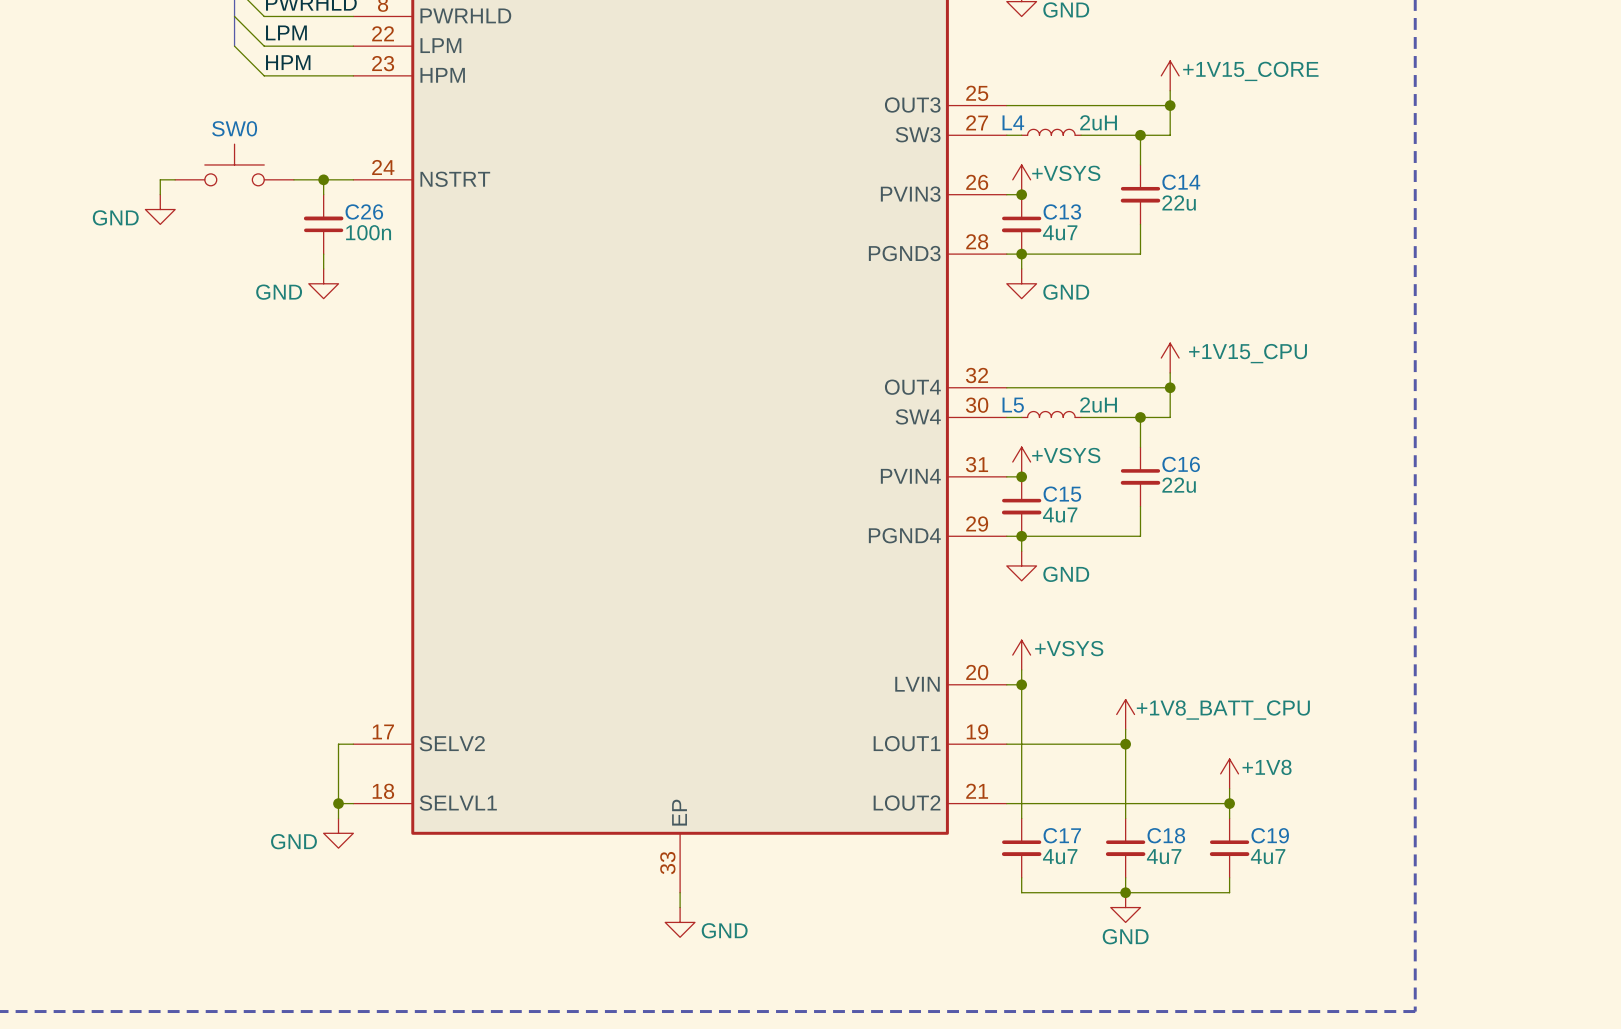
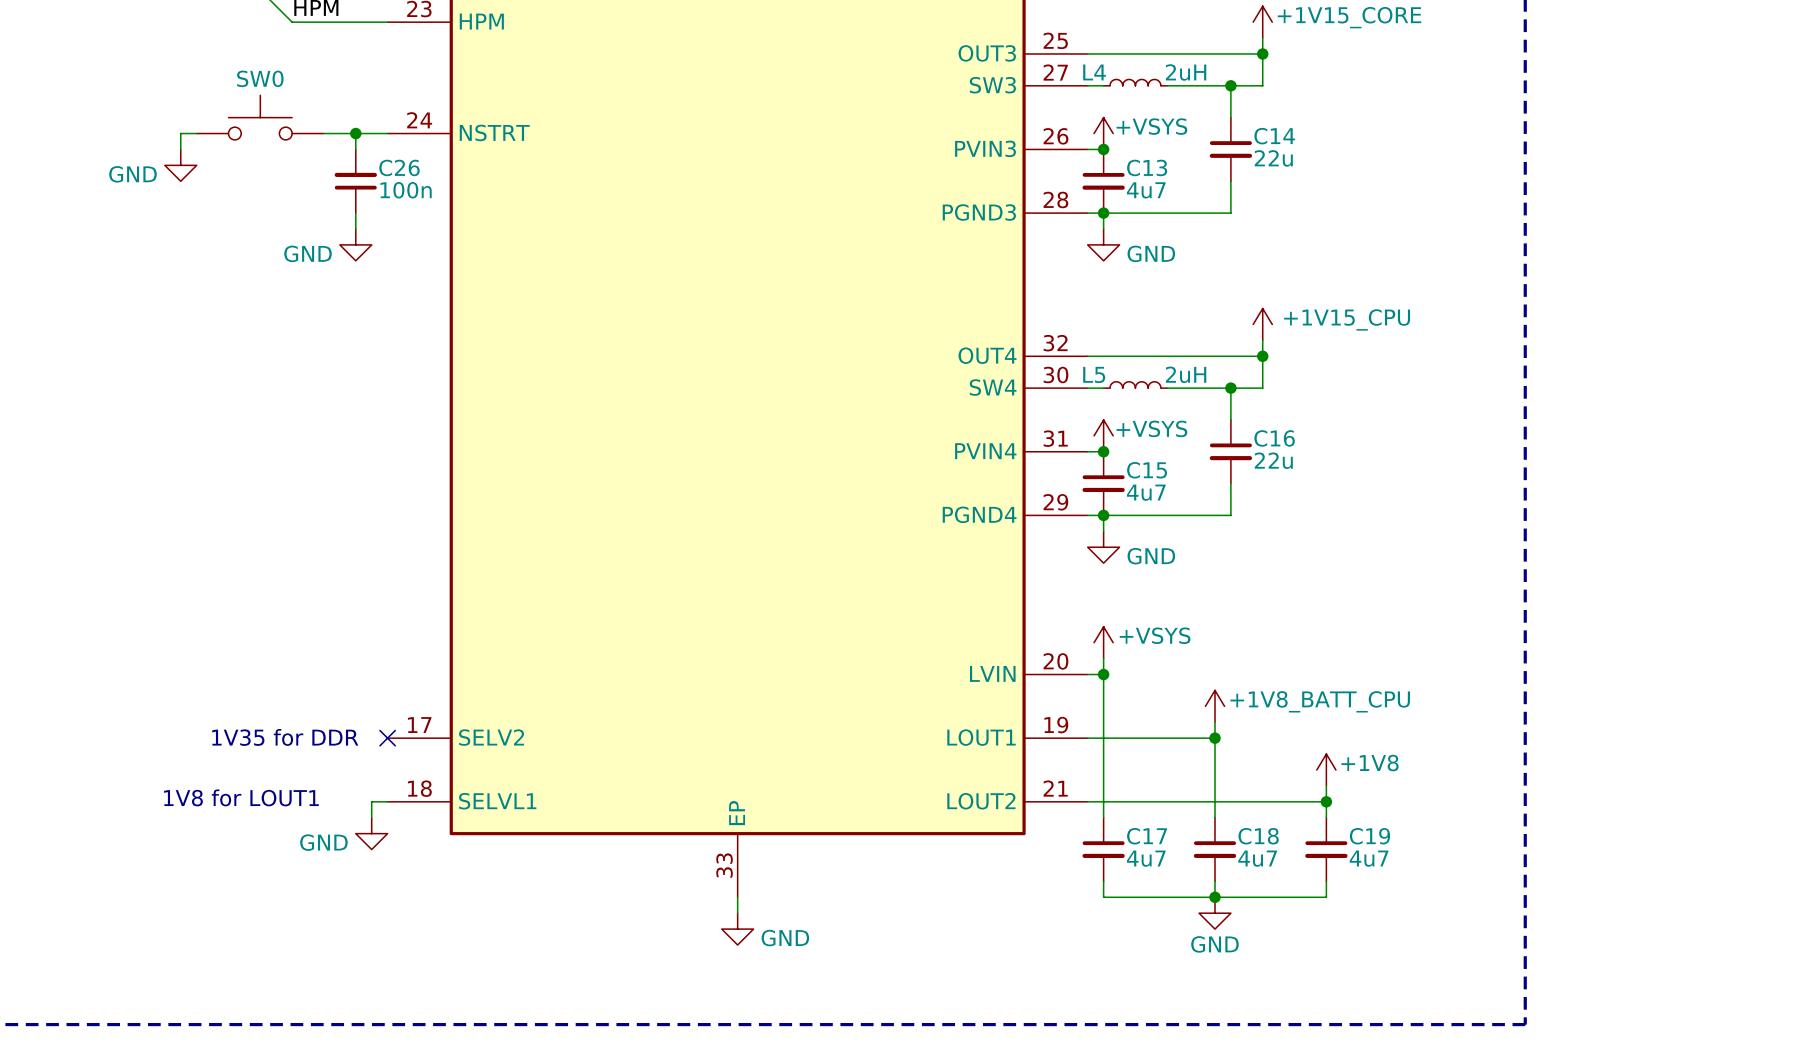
text: none -> 1V35 for DDR (285, 737)
wire: (353, 744) (338, 744) (338, 803) -> none
no-connect mark: none -> (387, 738)
text: none -> 1V8 for LOUT1 (241, 797)
junction: (338, 803) -> none

